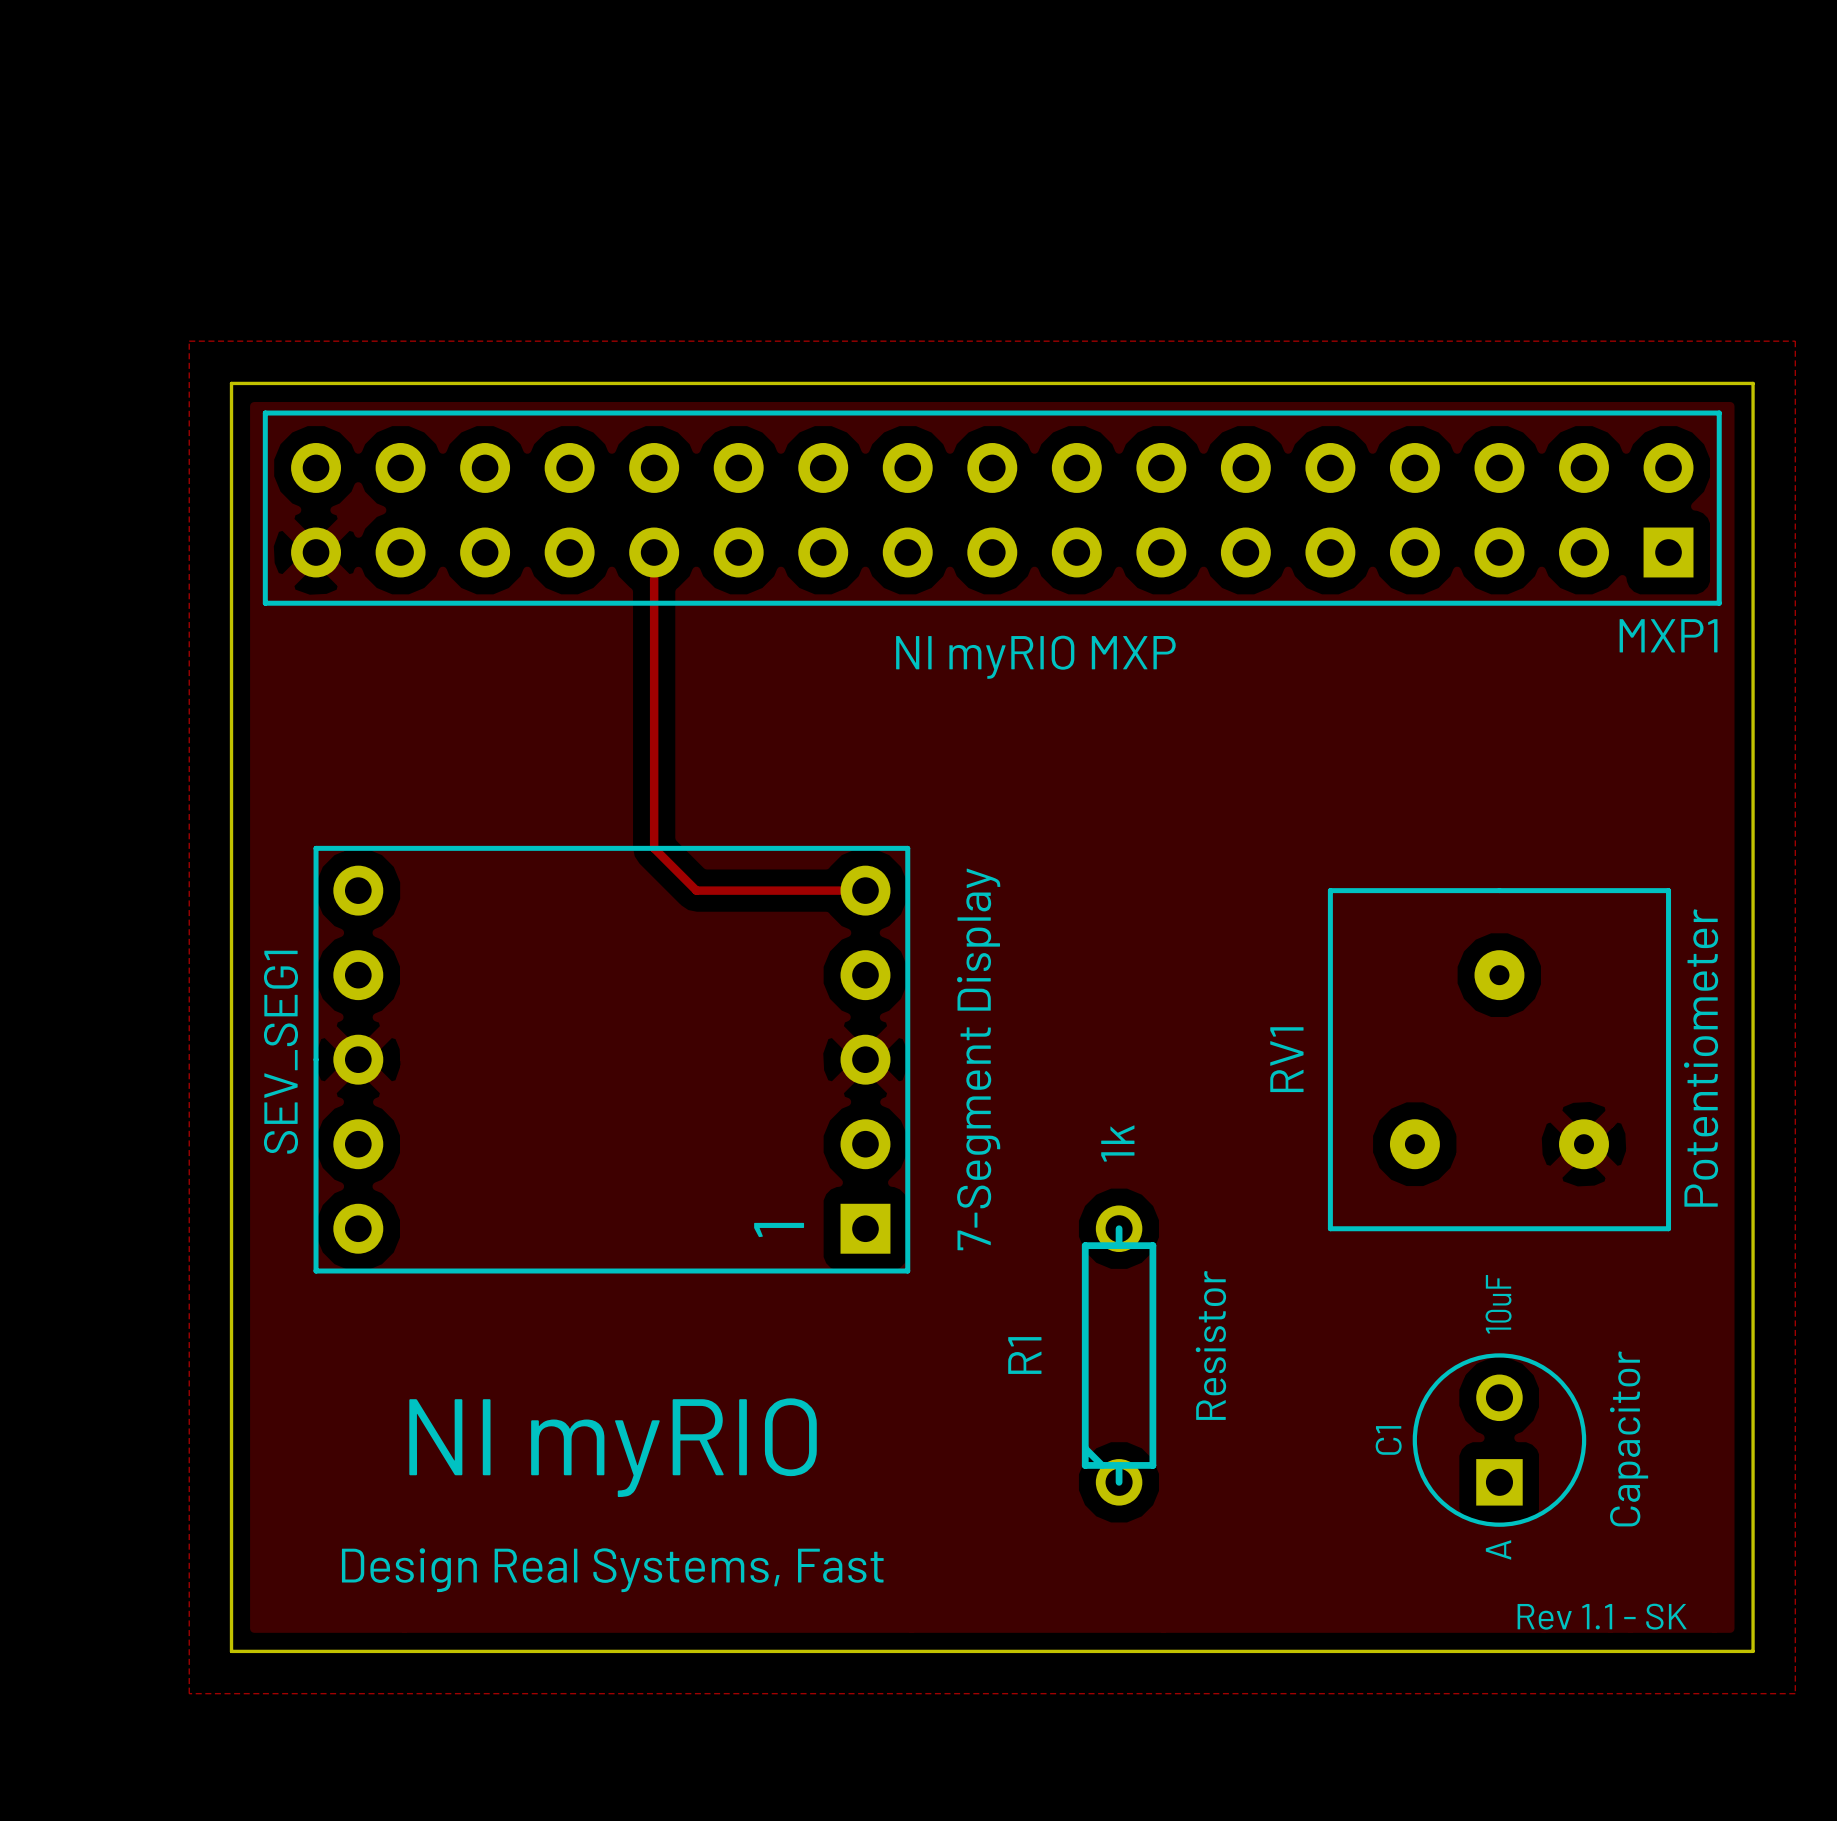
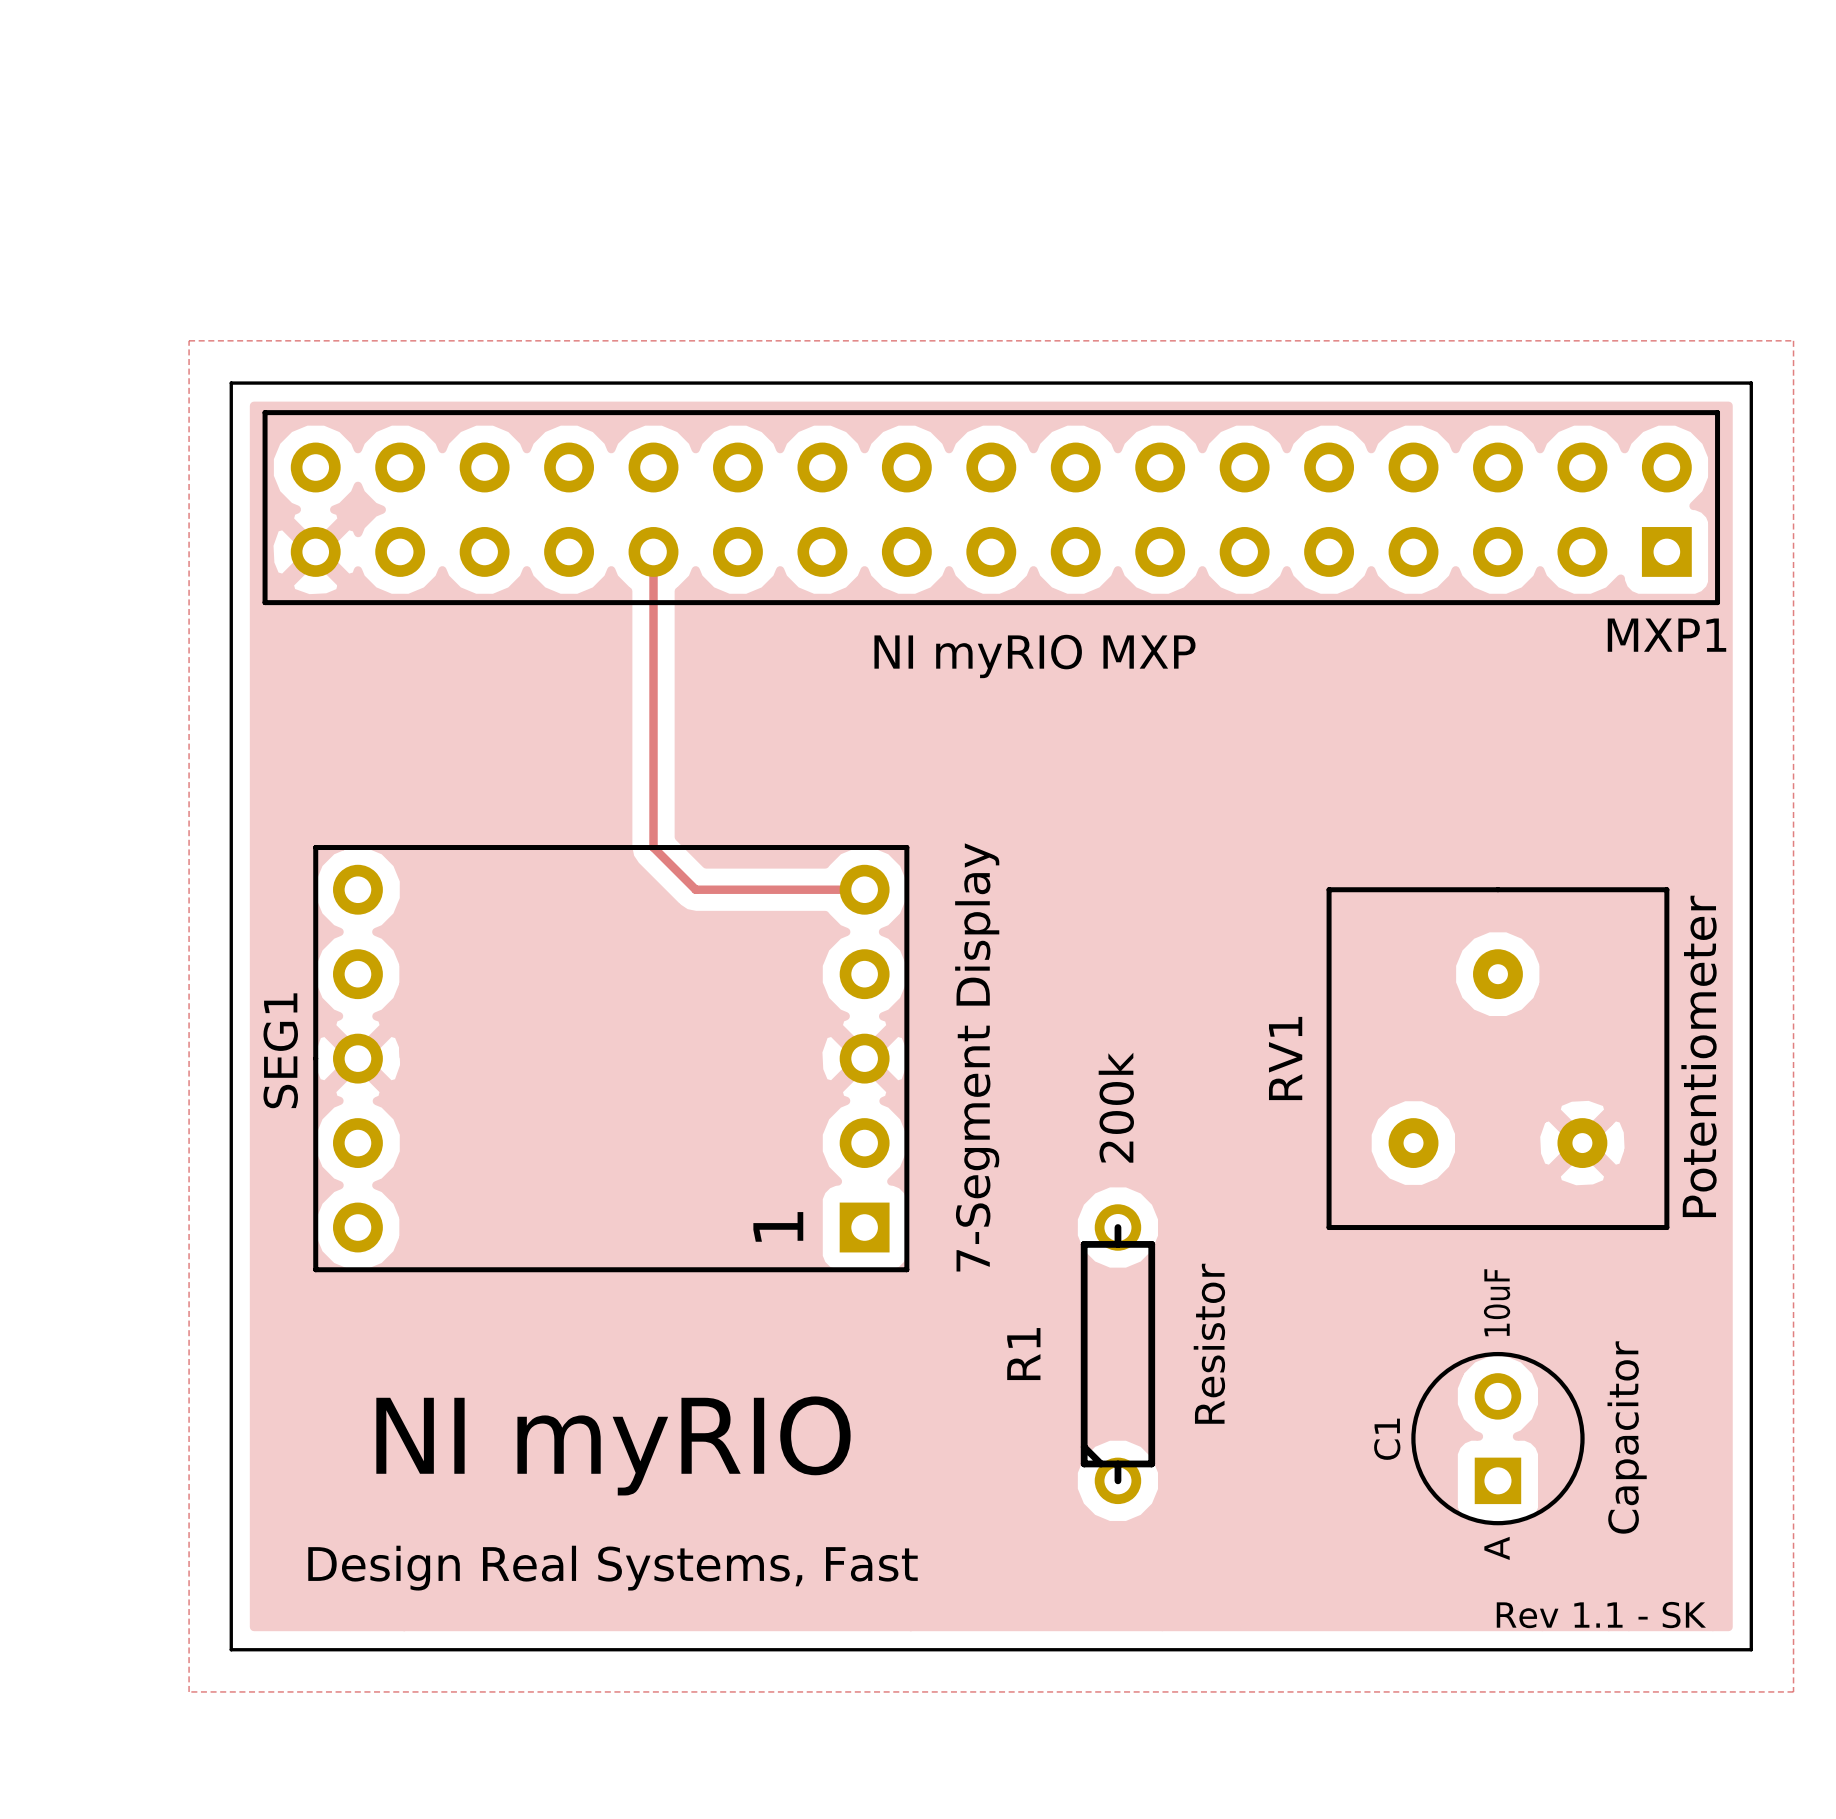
SEV_SEG1 name: SEV_SEG1 (280, 1052) -> SEG1 (280, 1050)
R1 value: 1k (1117, 1143) -> 200k (1116, 1107)

